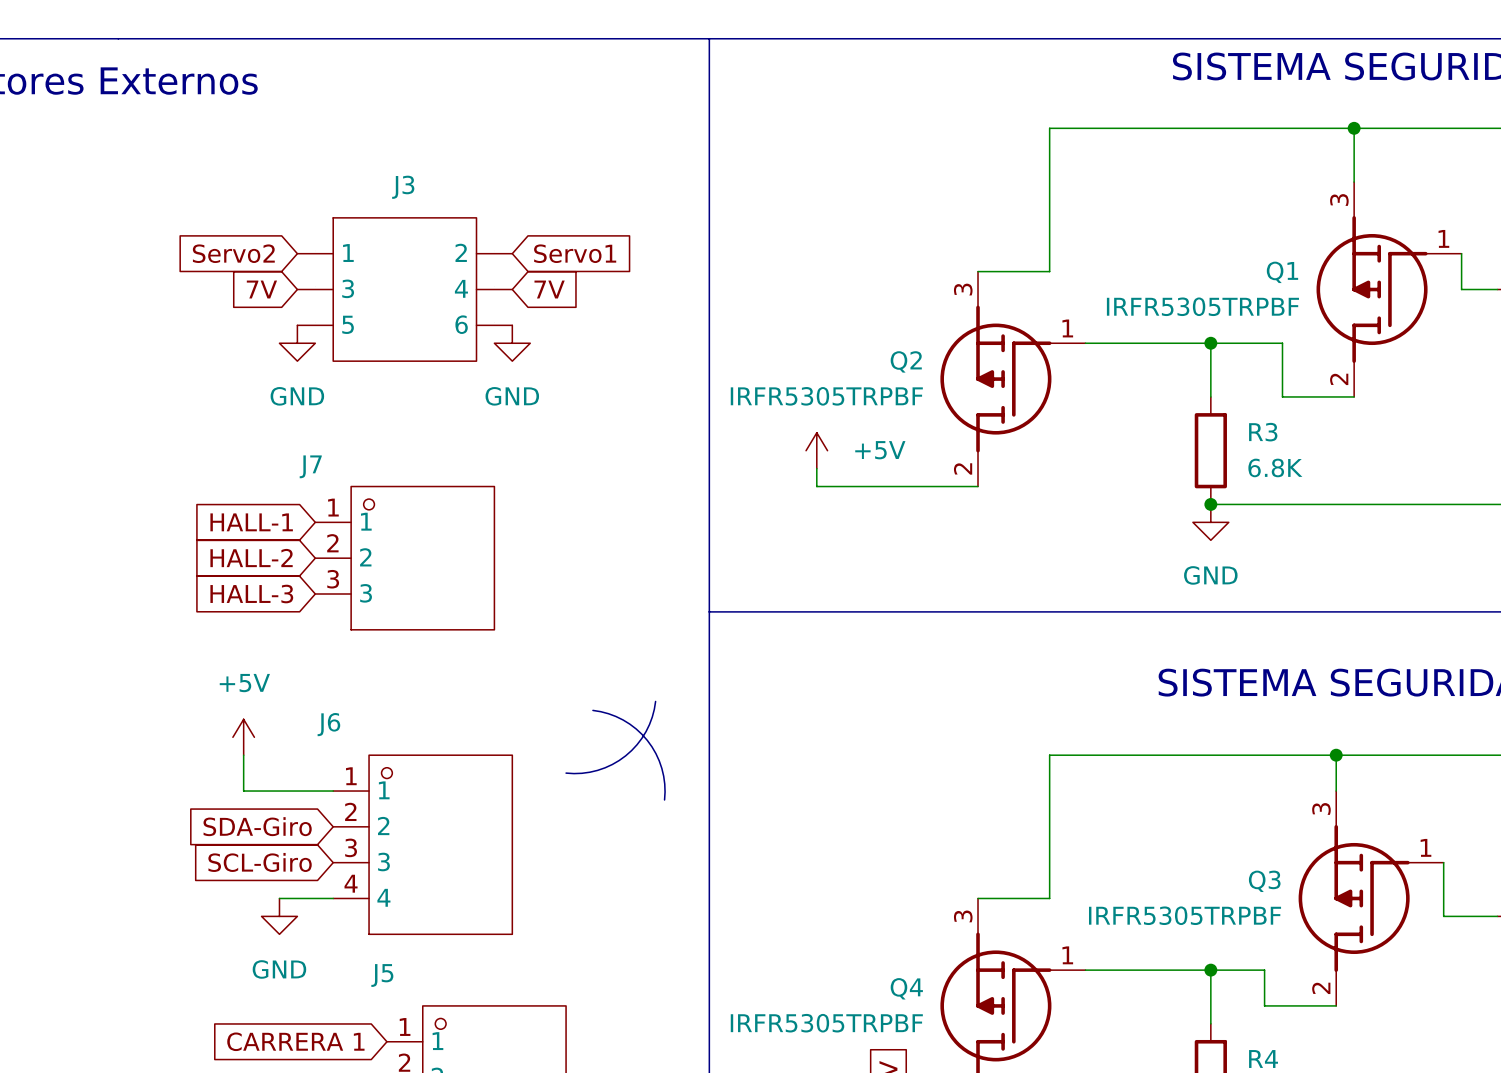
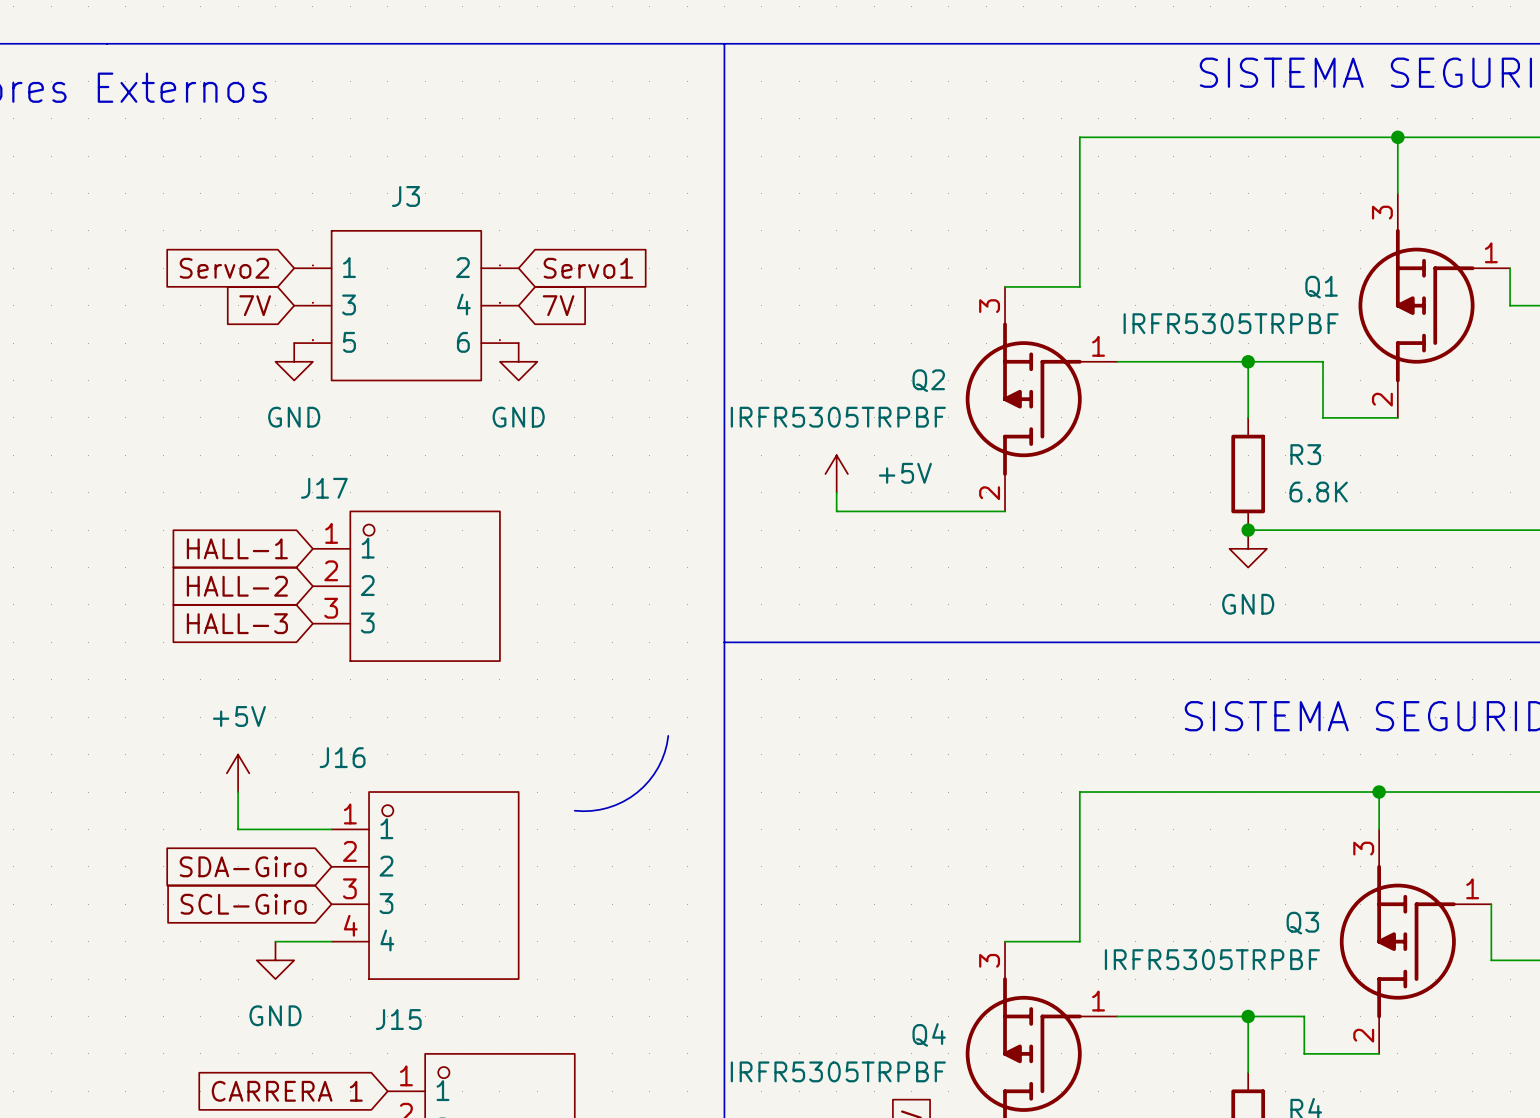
J7 name: J7 (310, 466) -> J17 (324, 488)
line: (592, 710) (608, 713) (623, 719) (636, 728) (647, 740) (655, 753) (661, 768) (664, 784) (664, 799) -> none
J6 name: J6 (328, 724) -> J16 (342, 757)
J5 name: J5 (382, 975) -> J15 (398, 1019)

